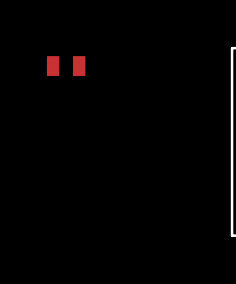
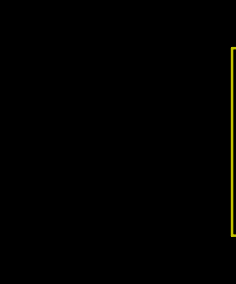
part: (66, 66) -> none

